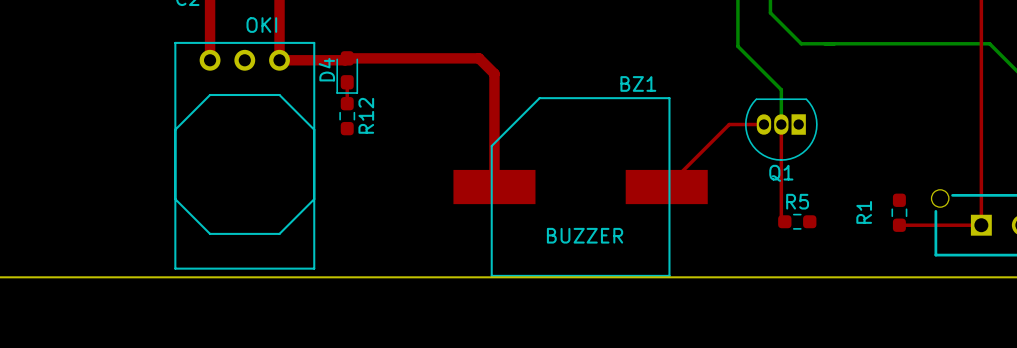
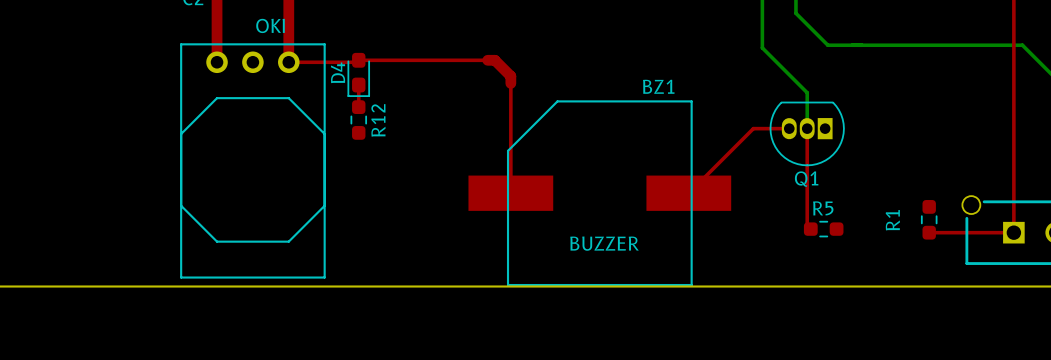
top track width: thick (472, 58) (279, 60) -> thin (487, 60) (288, 62)
top track width: thick (494, 80) (494, 187) -> thin (510, 83) (510, 193)

